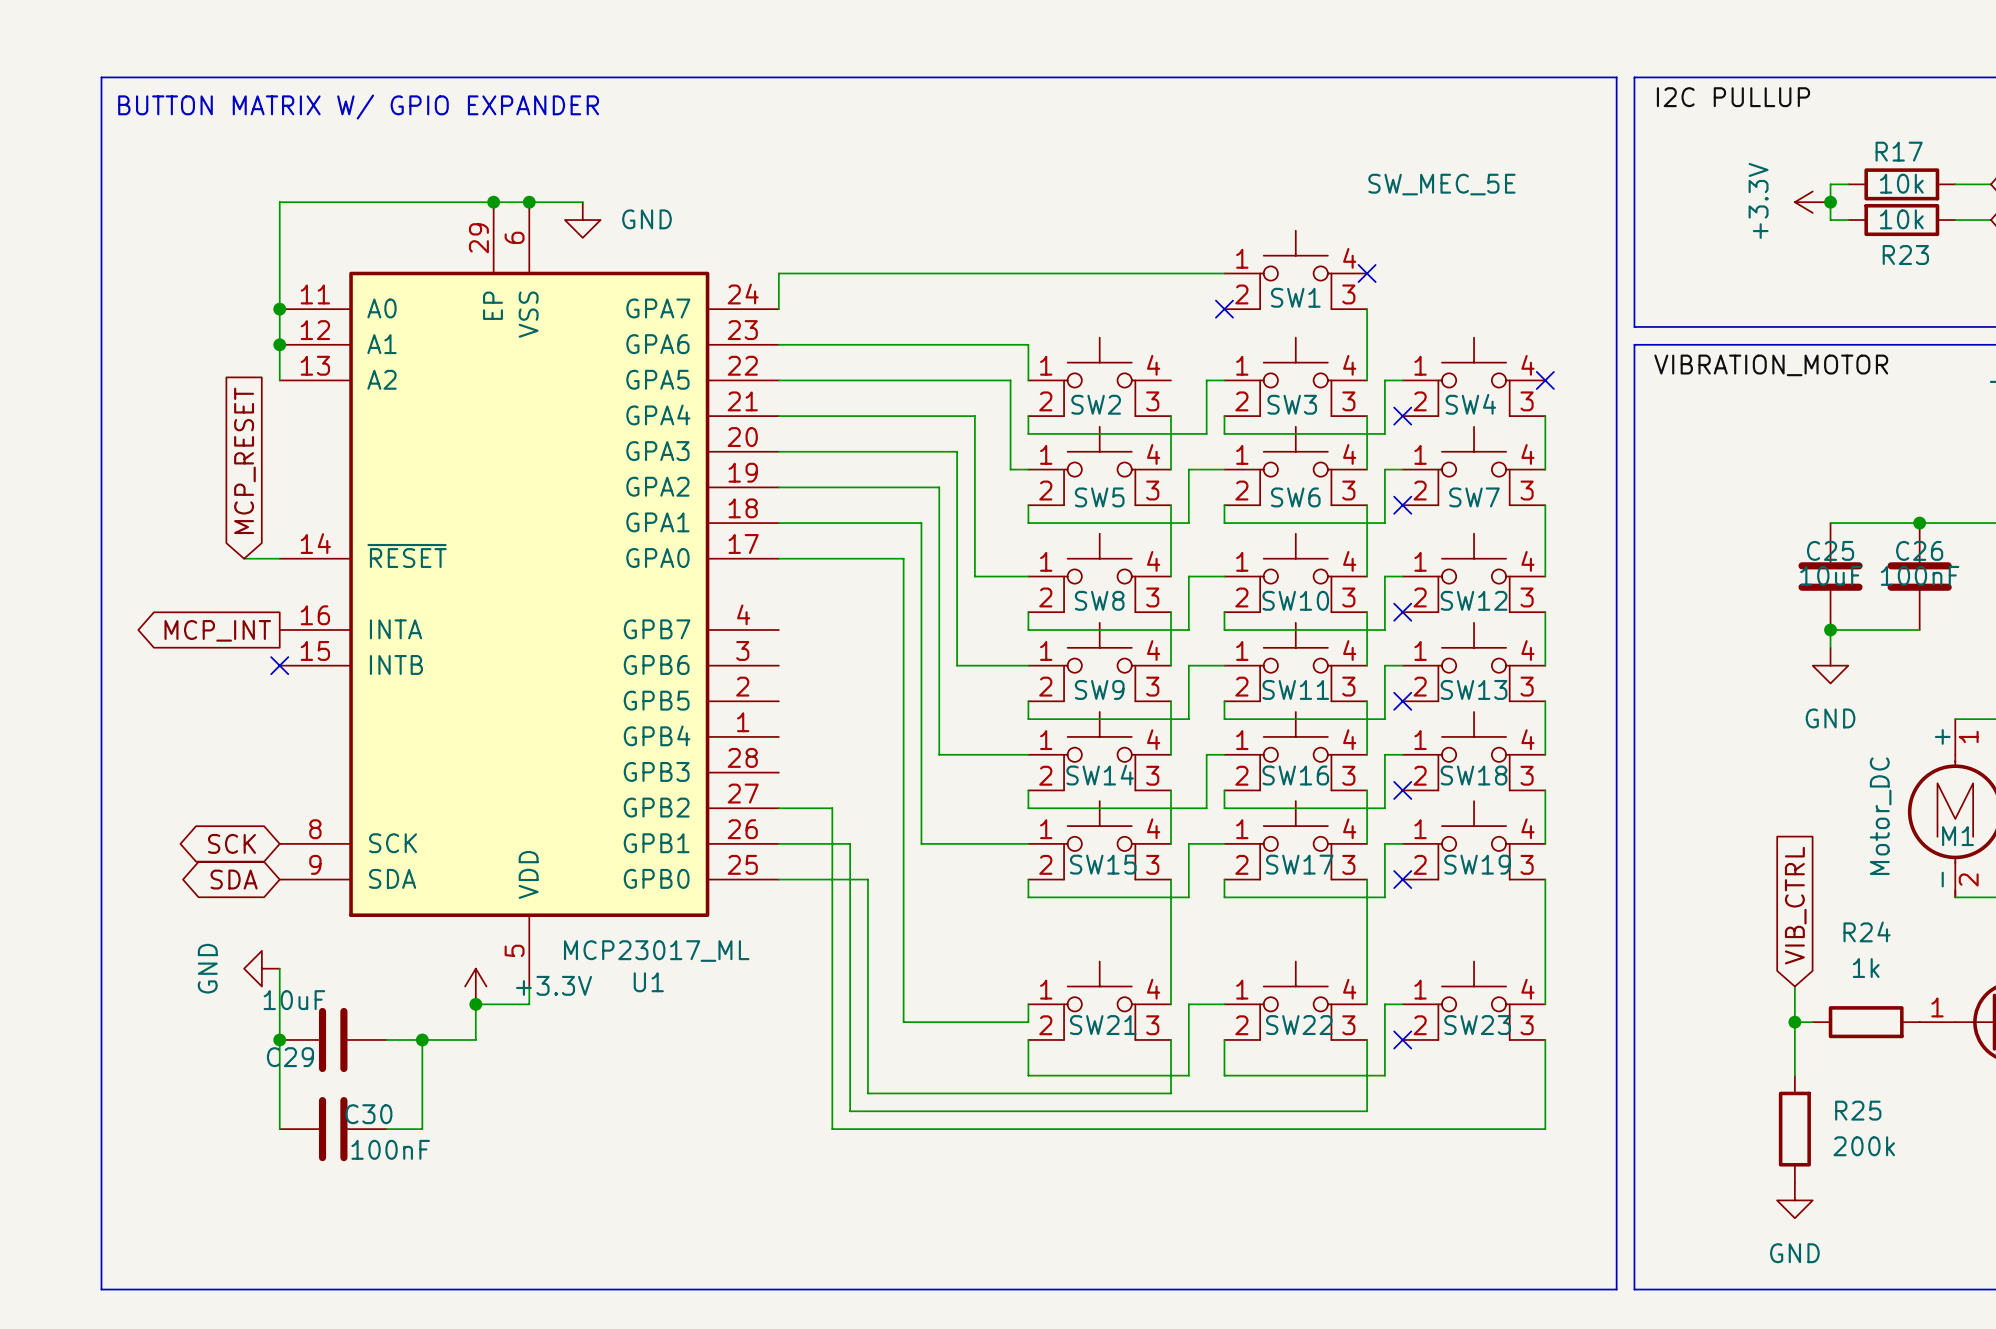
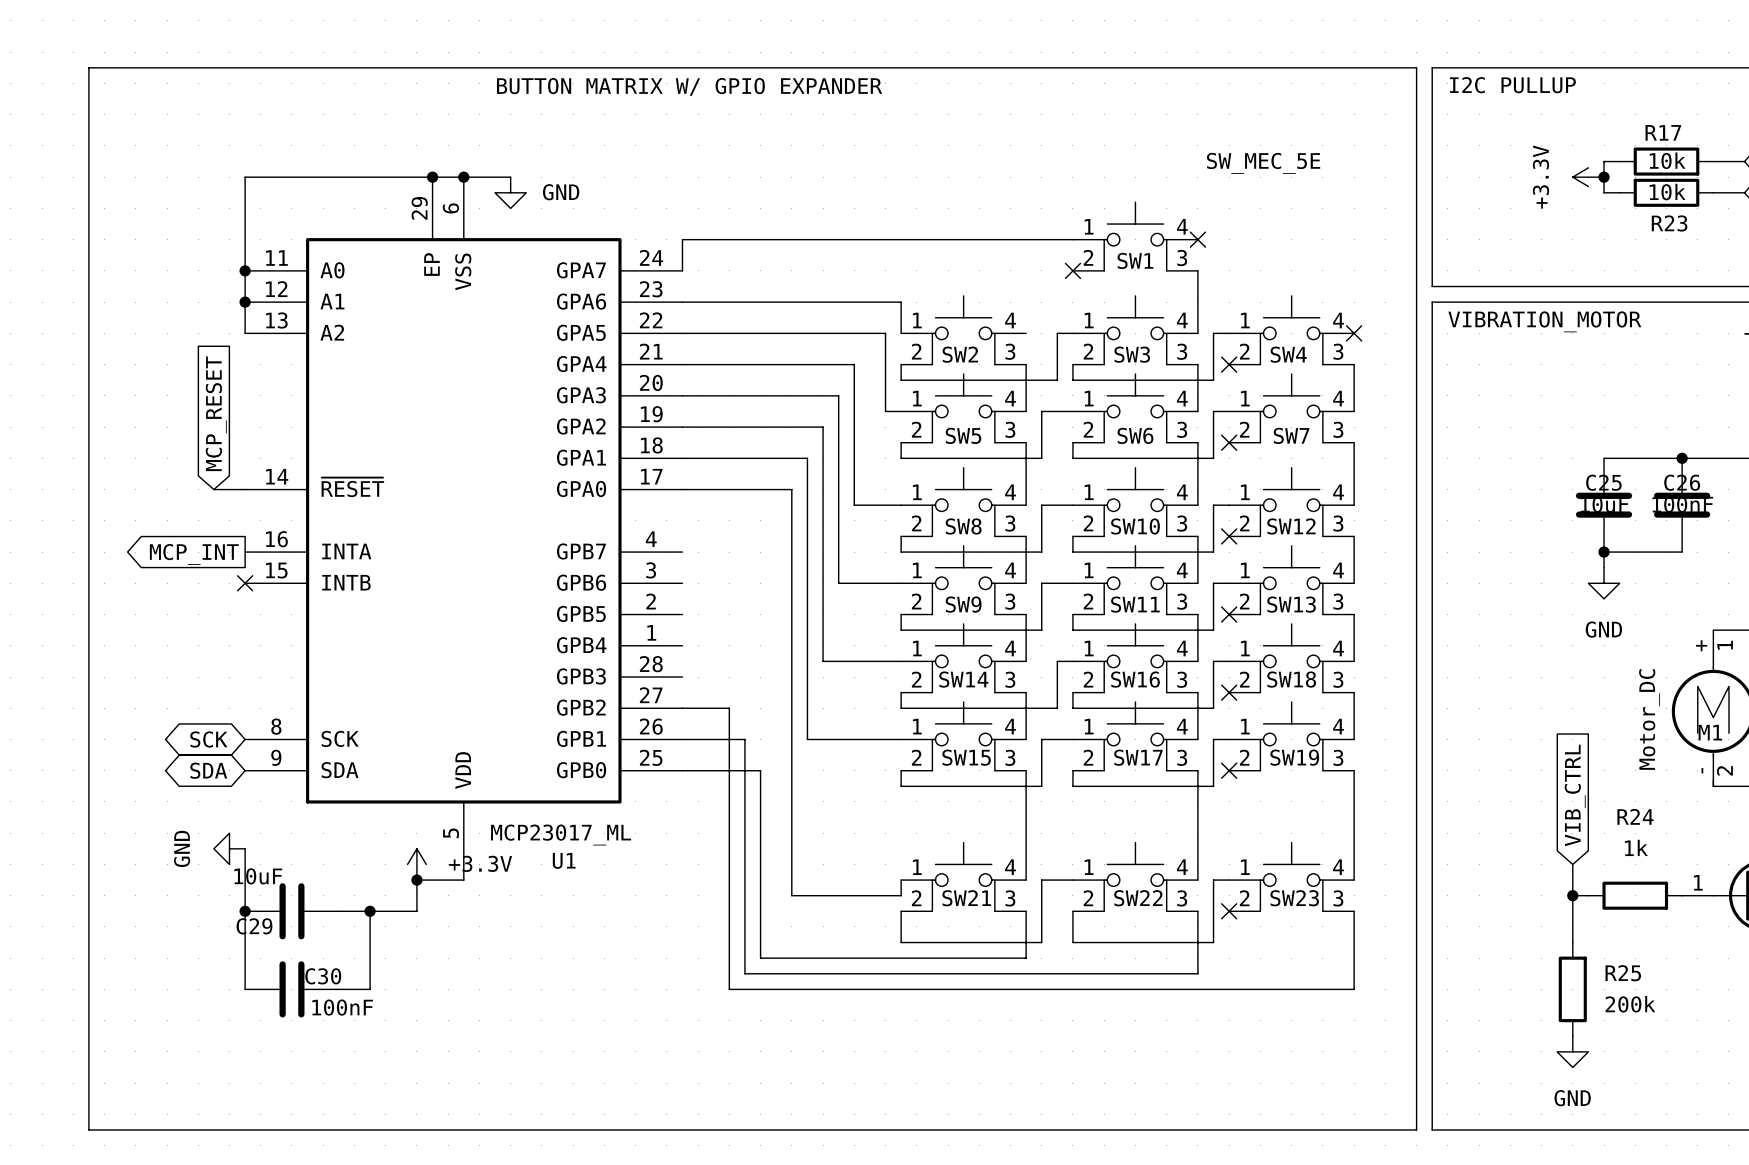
text: none -> BUTTON MATRIX W/ GPIO EXPANDER (689, 86)
text: BUTTON MATRIX W/ GPIO EXPANDER (358, 107) -> none

